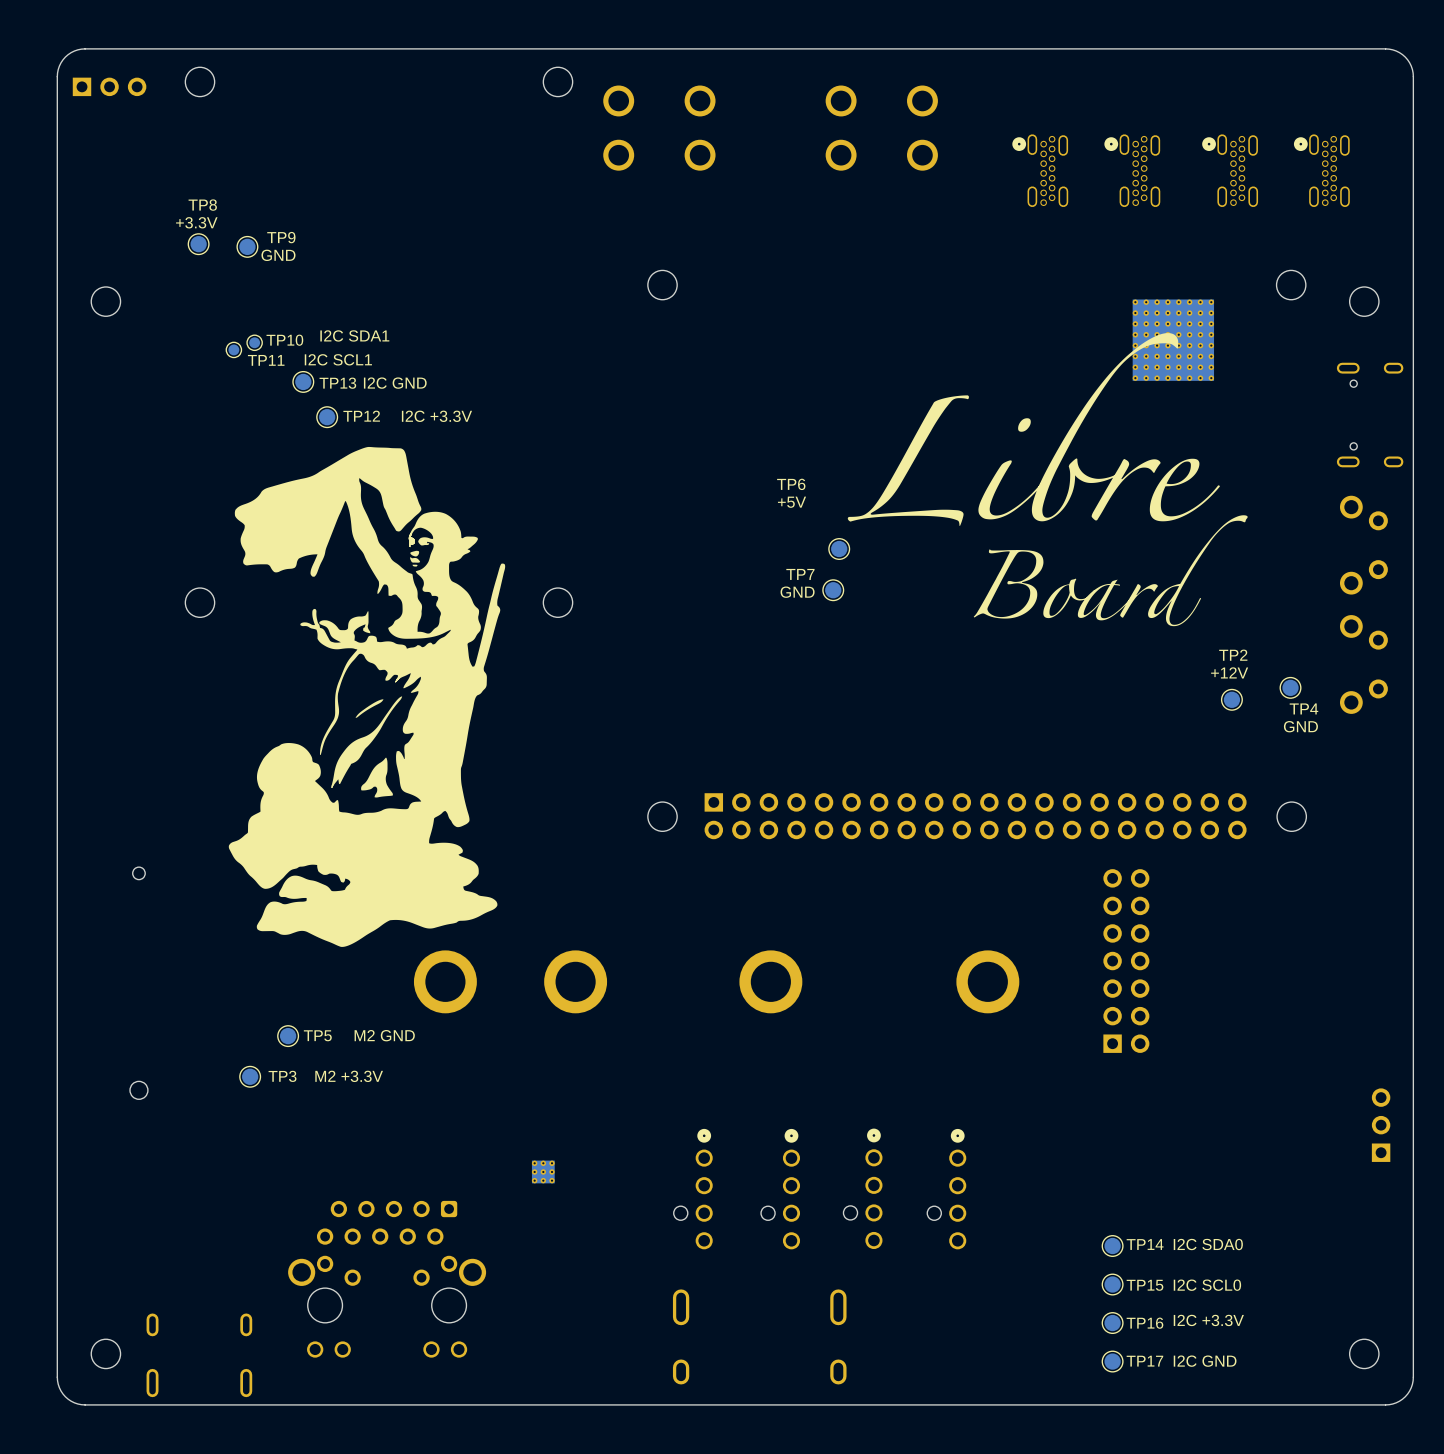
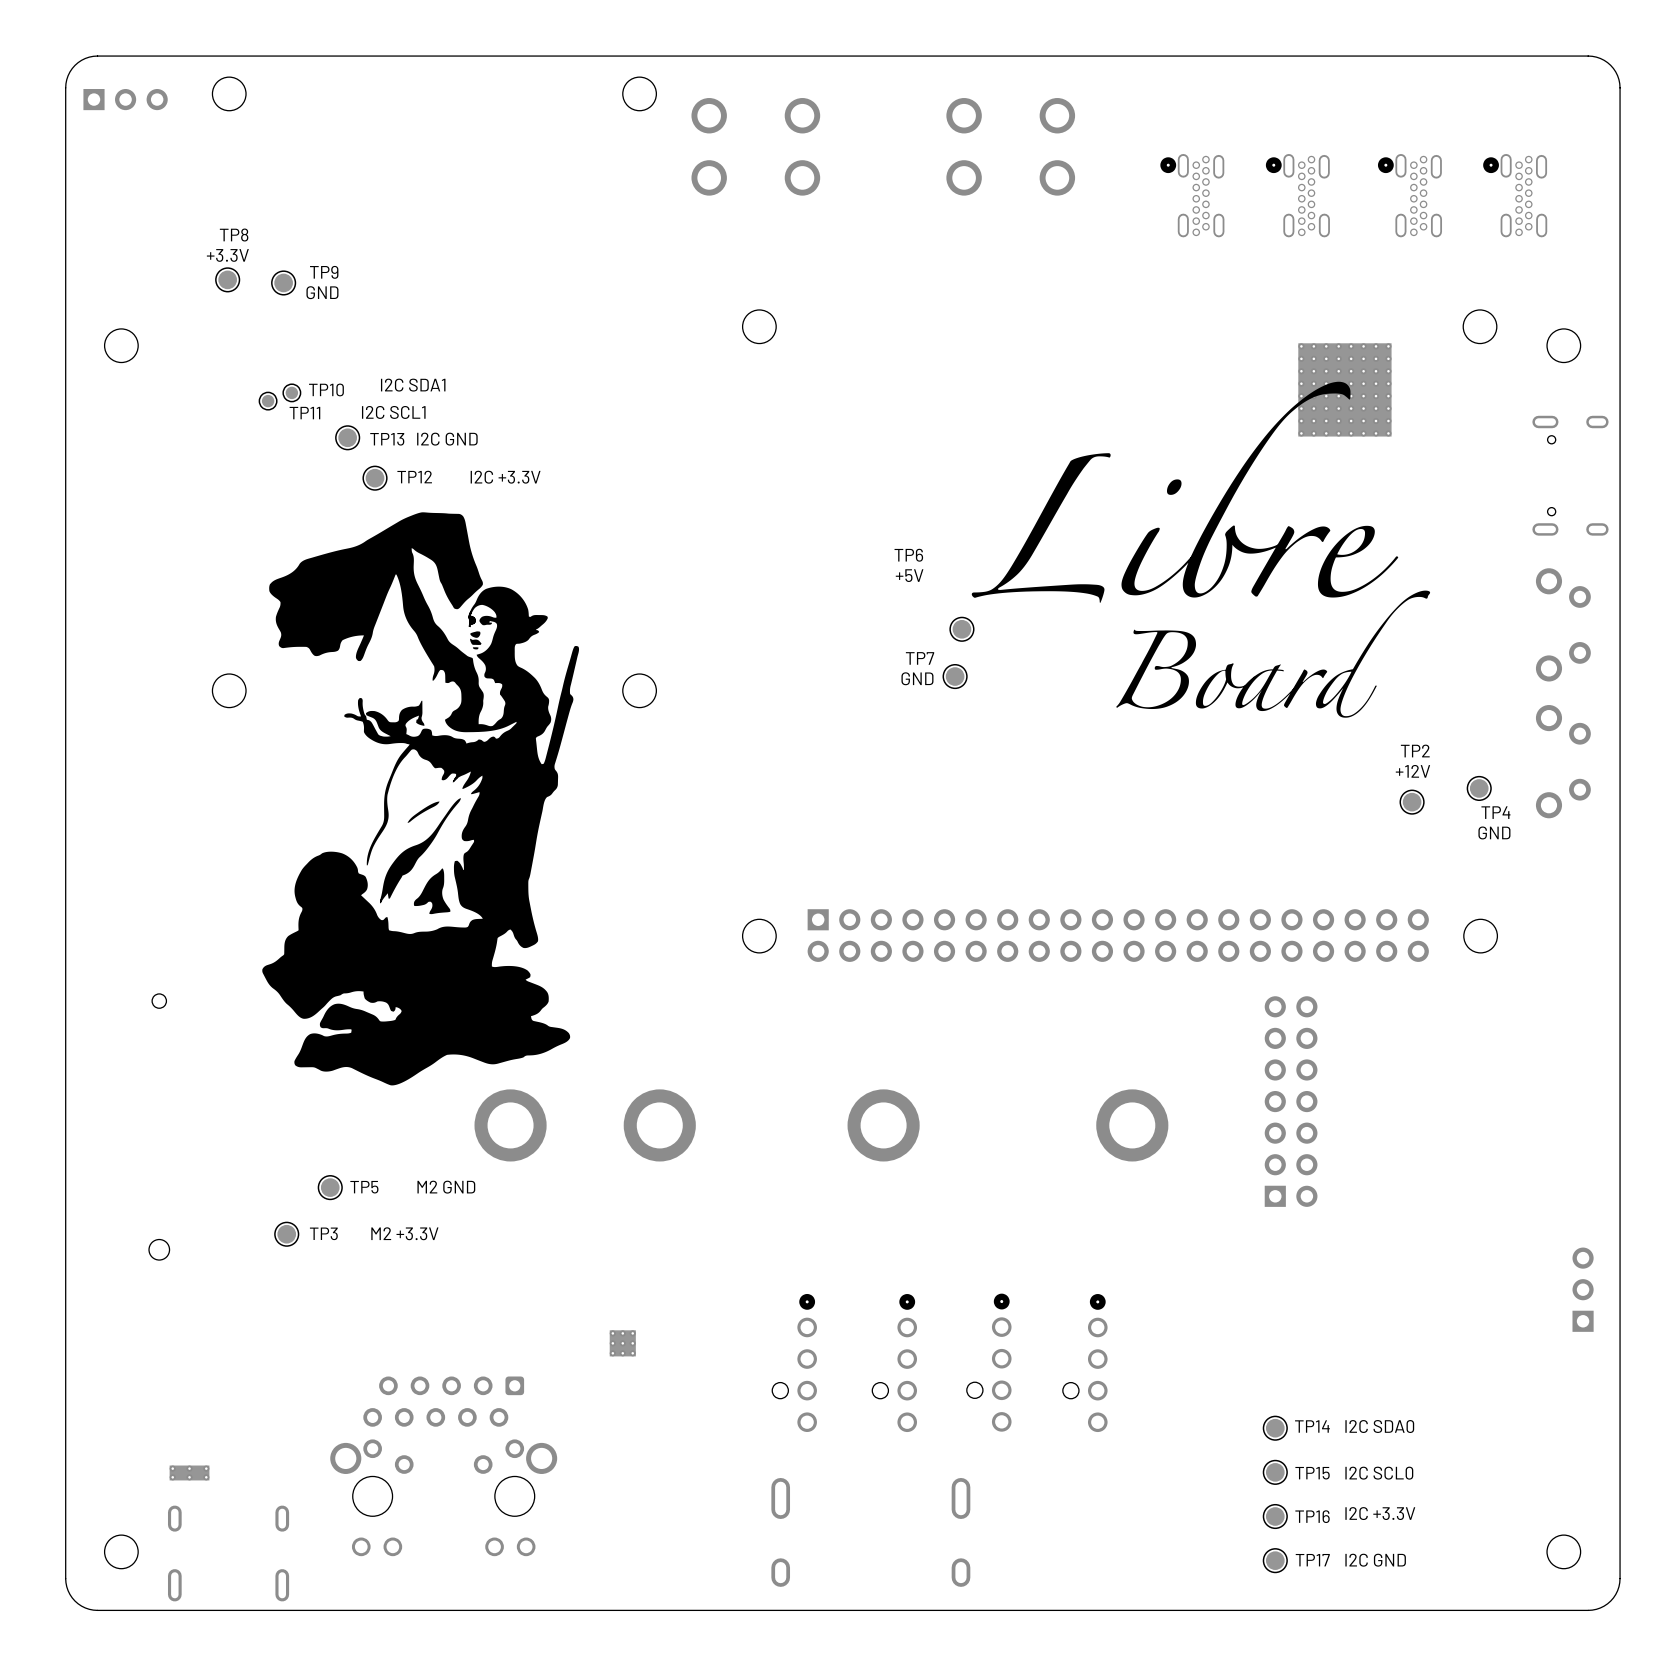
part: none -> (189, 1472)

